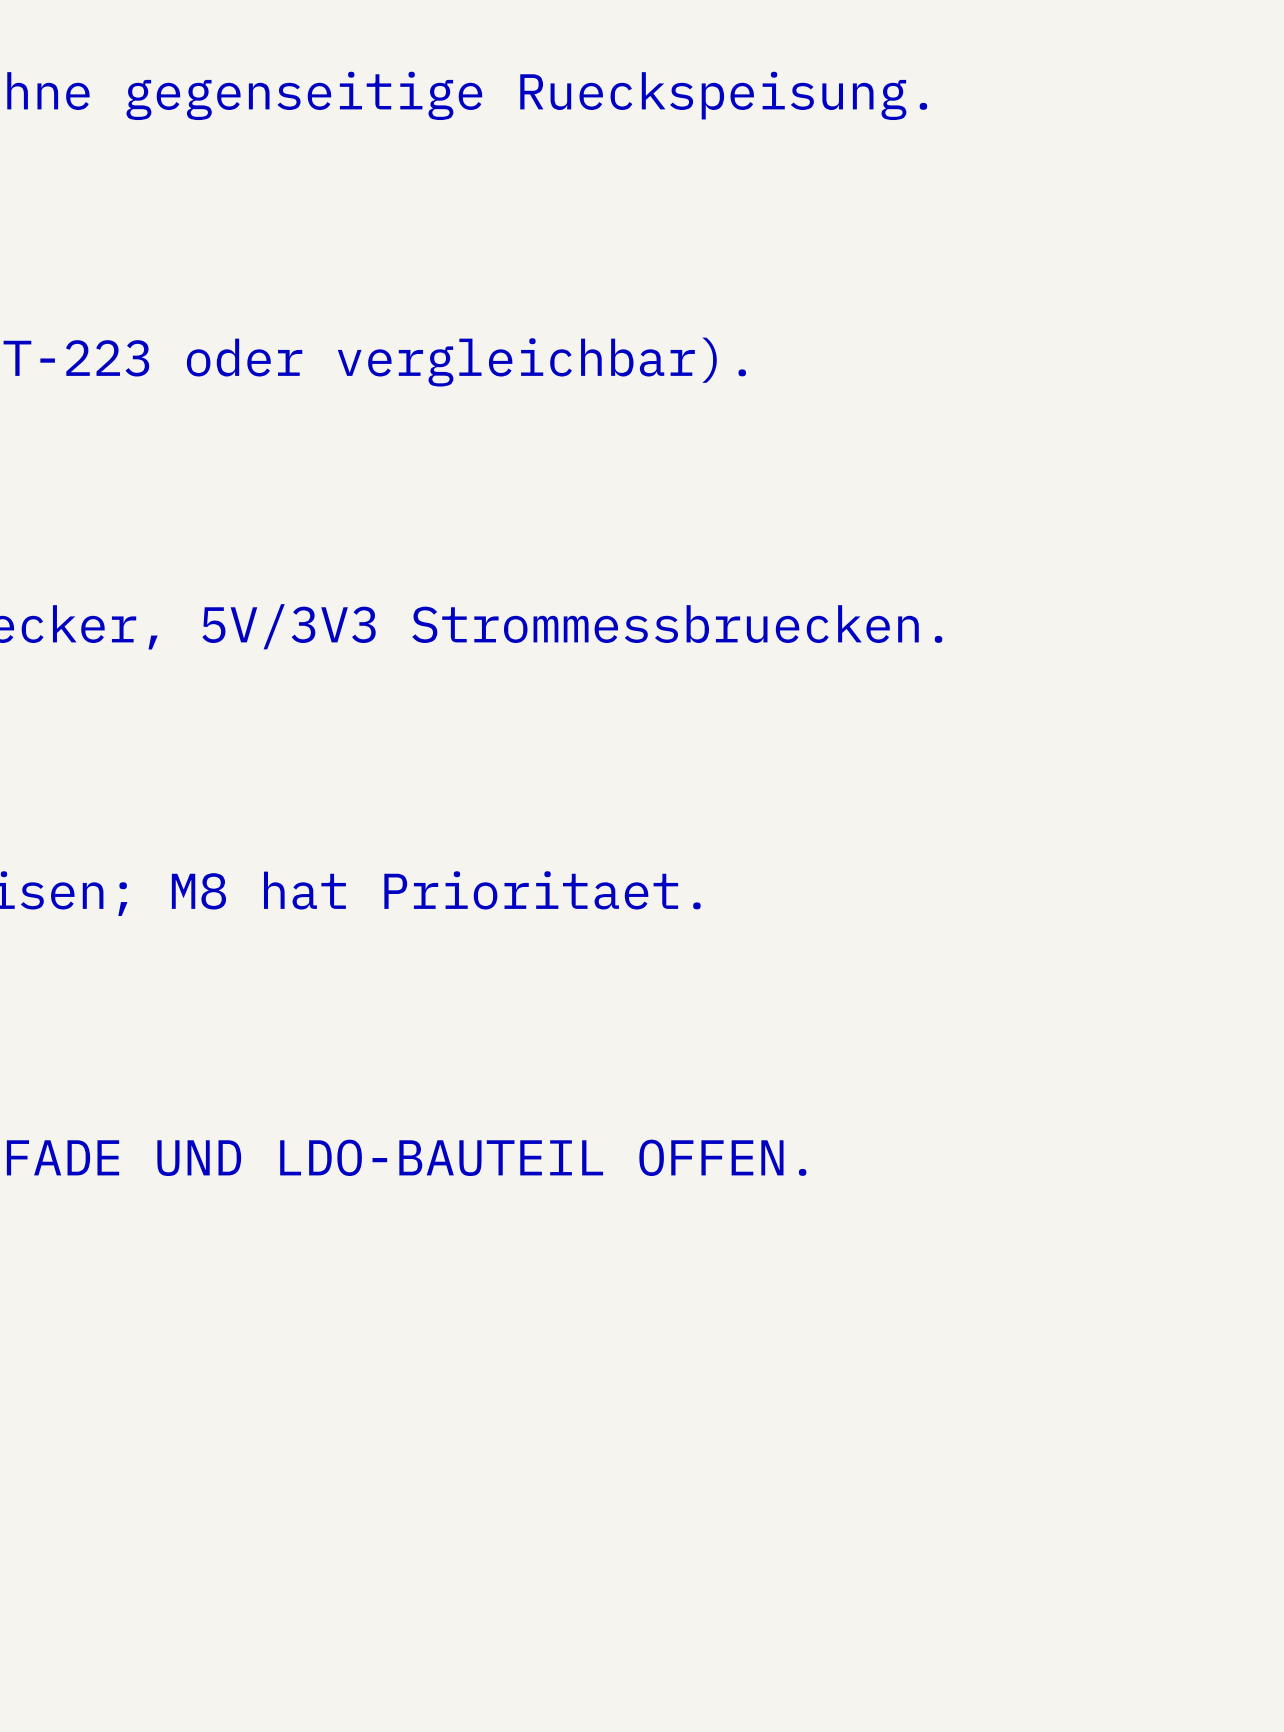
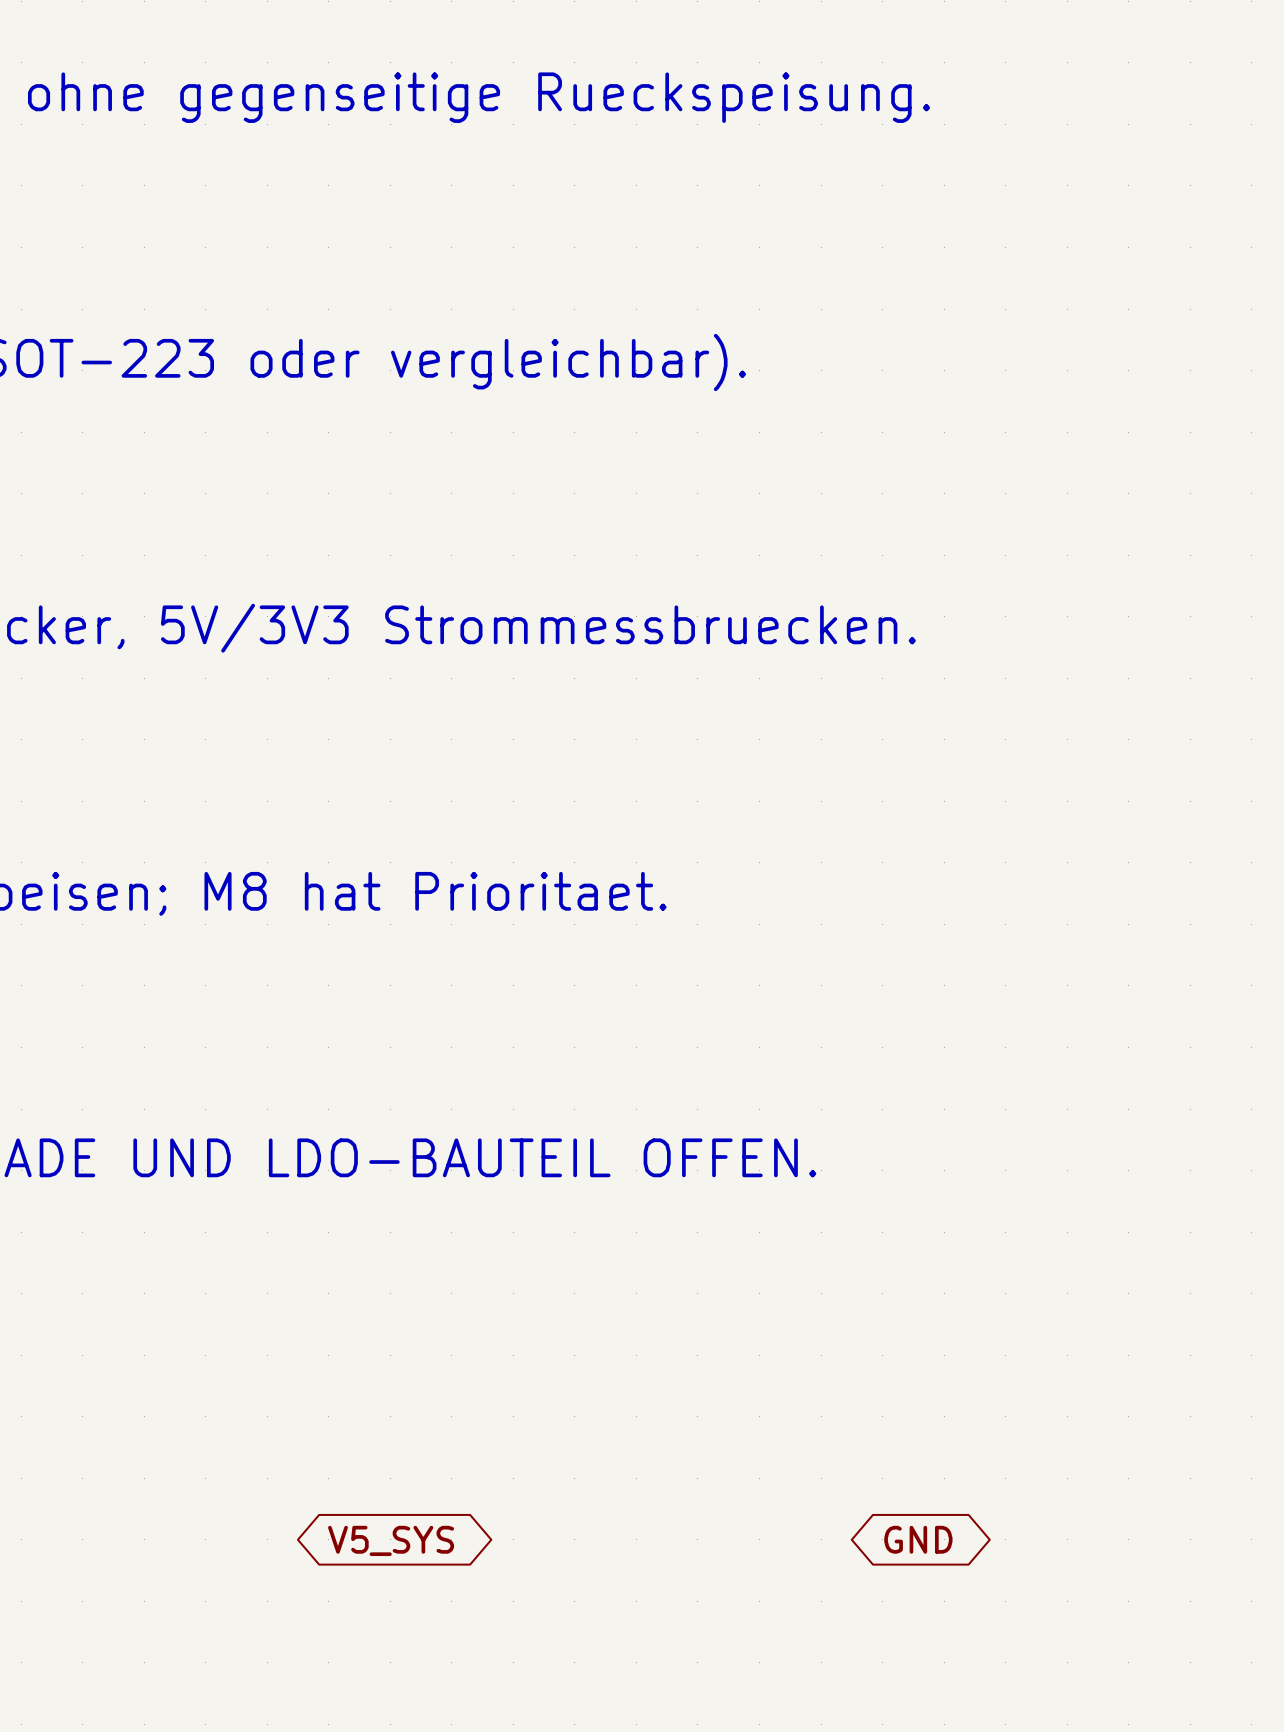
global label: none -> GND (918, 1539)
global label: none -> V5_SYS (391, 1540)

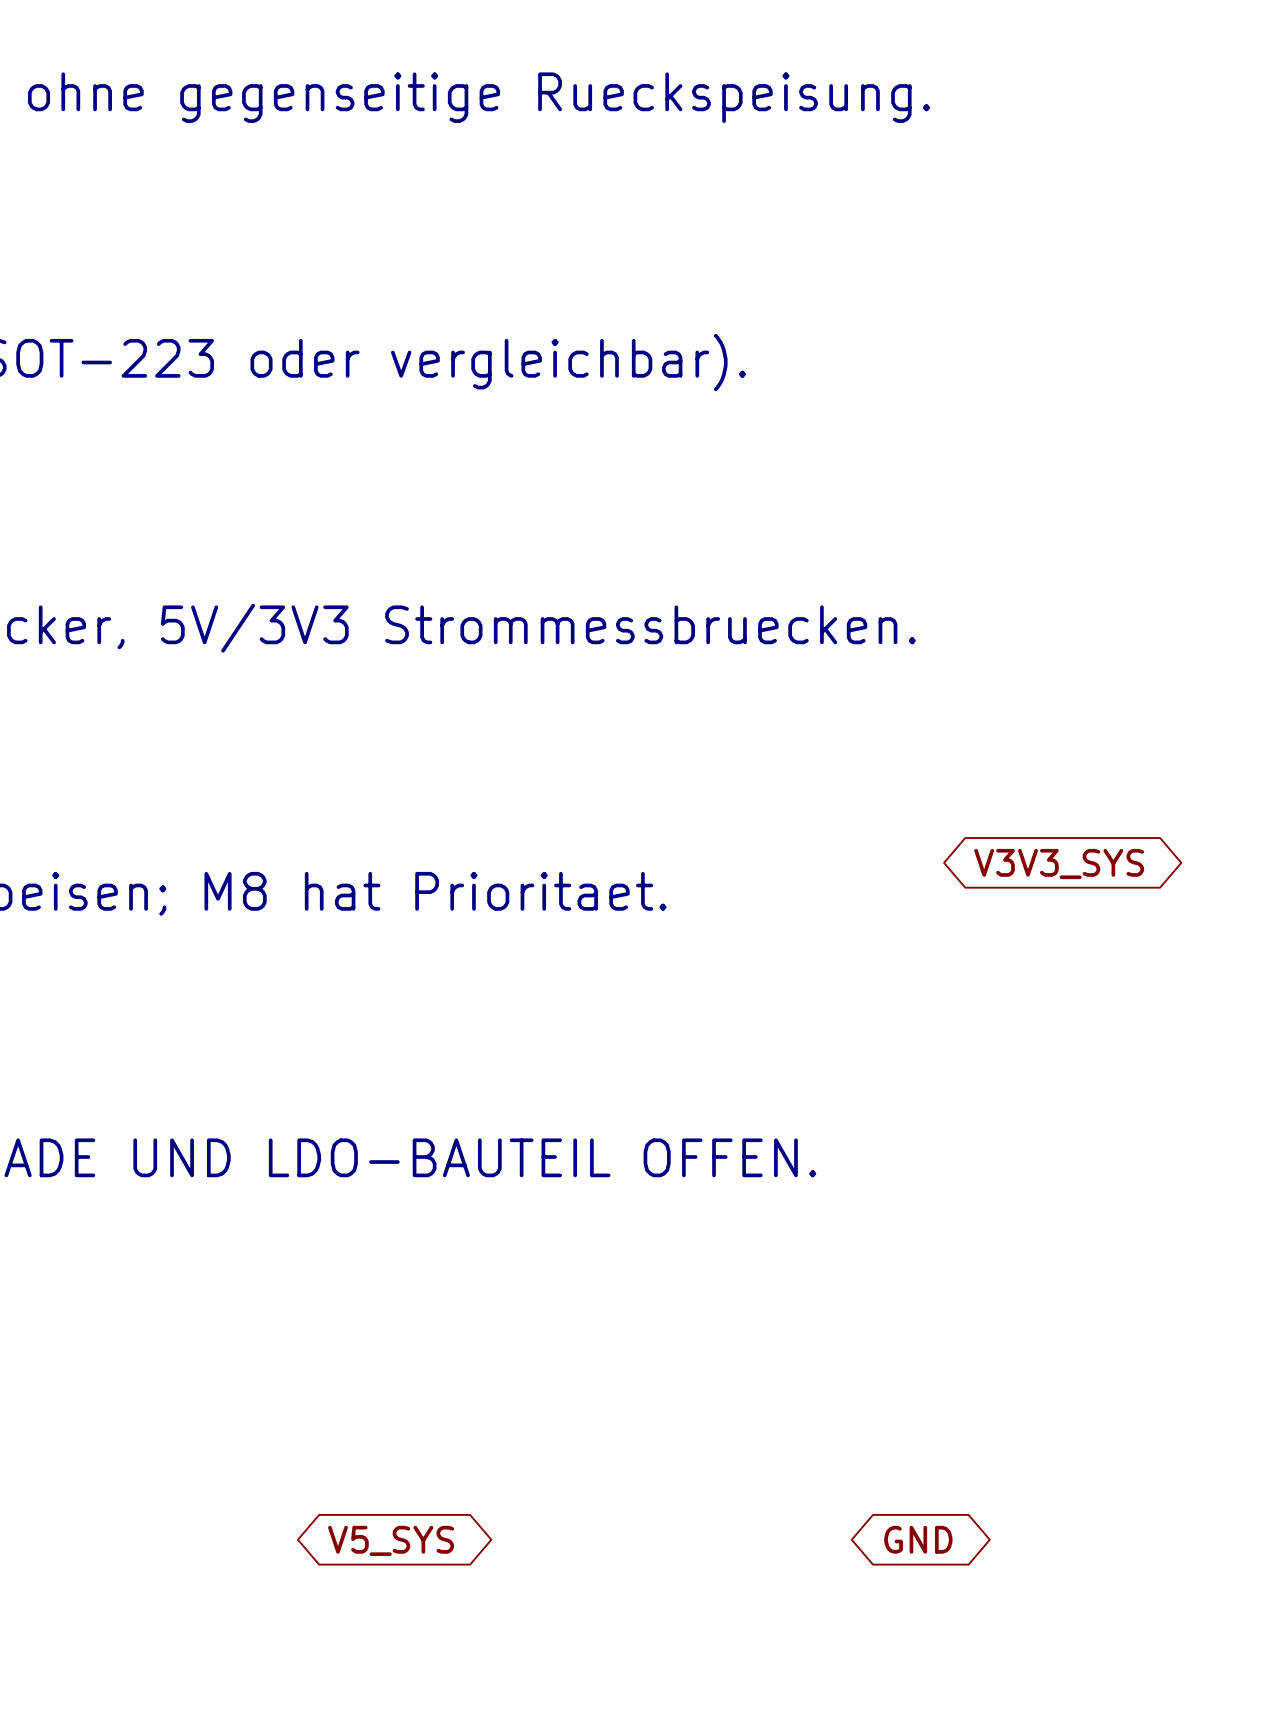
global label: none -> V3V3_SYS (1059, 864)

